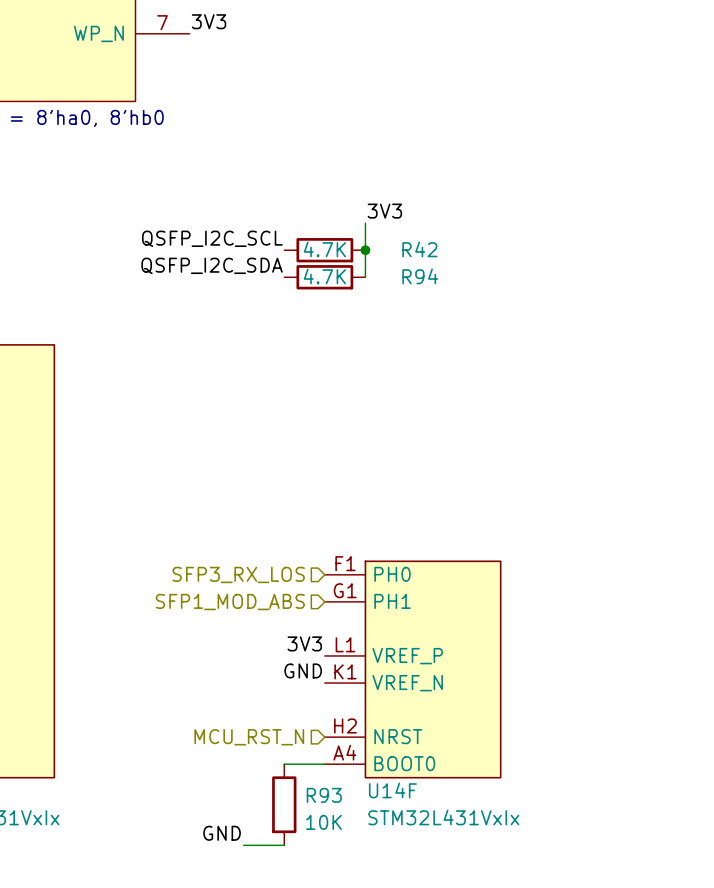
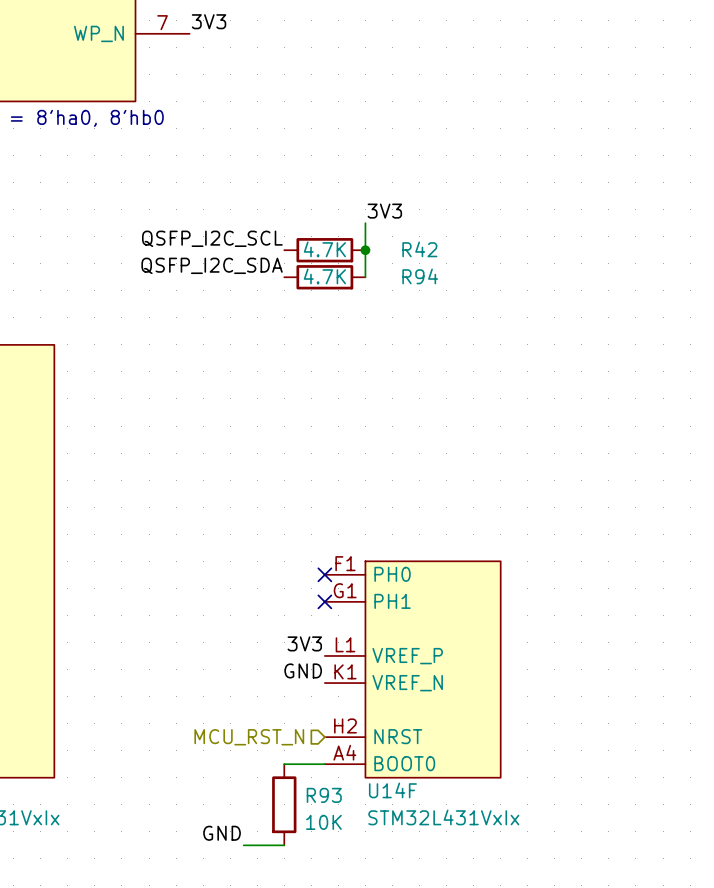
hierarchical label: SFP3_RX_LOS (238, 574) -> none
no-connect mark: none -> (324, 574)
no-connect mark: none -> (324, 601)
hierarchical label: SFP1_MOD_ABS (230, 602) -> none

